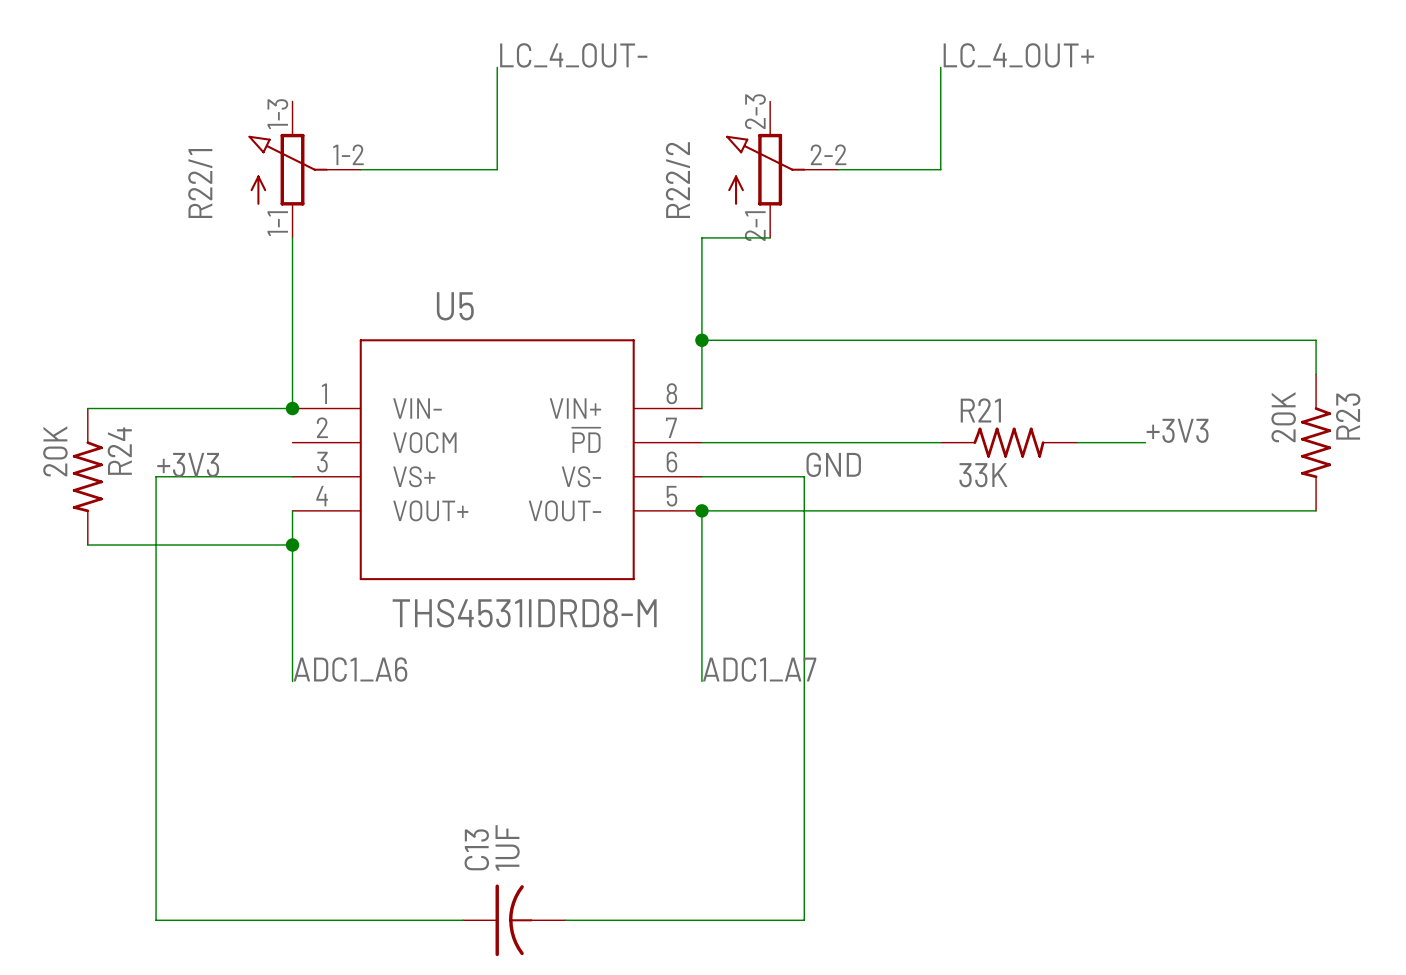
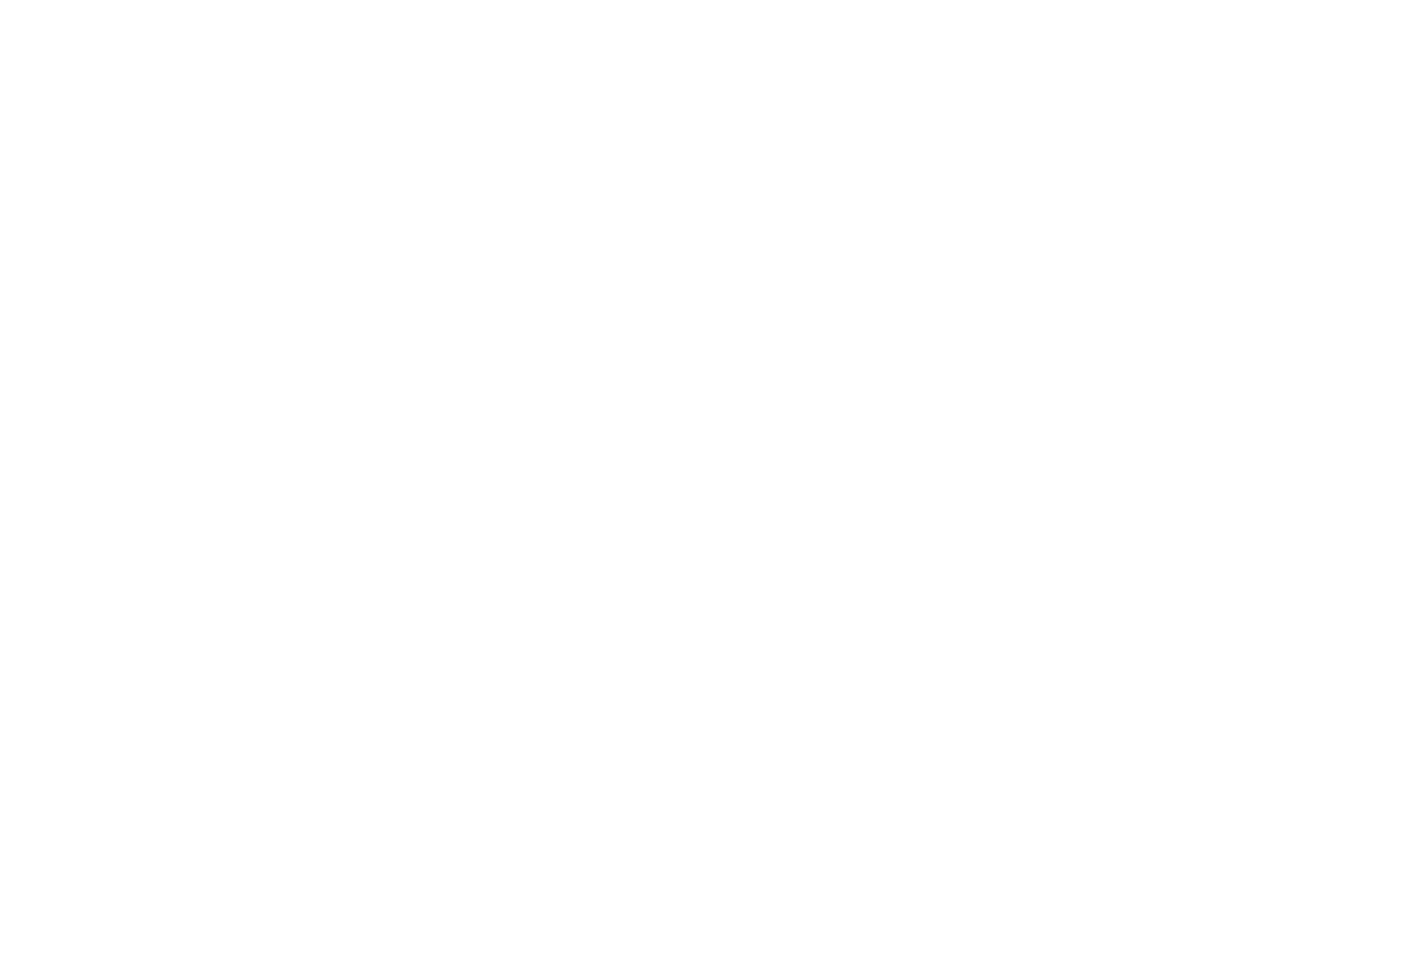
label: LC_4_OUT- (573, 55) -> none
label: LC_4_OUT+ (1018, 55) -> none
wire: (497, 67) (497, 169) (360, 169) -> none
wire: (940, 67) (940, 169) (838, 169) -> none
R22/1: (304, 169) -> none
R22/2: (782, 169) -> none
wire: (292, 237) (292, 408) (87, 408) -> none
wire: (770, 237) (701, 237) (701, 408) -> none
wire: (701, 340) (1316, 340) (1316, 374) -> none
junction: (701, 340) -> none
junction: (292, 408) -> none
label: +3V3 (1177, 430) -> none
wire: (701, 442) (940, 442) -> none
R21: 33K (1009, 442) -> none
wire: (1077, 442) (1145, 442) -> none
R23: 20K (1316, 442) -> none
U5: THS4531IDRD8-M (497, 459) -> none
label: +3V3 (188, 464) -> none
label: GND (833, 464) -> none
R24: 20K (87, 476) -> none
wire: (292, 476) (156, 476) (156, 920) (463, 920) -> none
wire: (701, 476) (804, 476) (804, 920) (565, 920) -> none
wire: (292, 510) (292, 681) -> none
junction: (701, 510) -> none
wire: (1316, 510) (701, 510) (701, 681) -> none
wire: (87, 544) (292, 544) -> none
junction: (292, 544) -> none
label: ADC1_A6 (350, 669) -> none
label: ADC1_A7 (759, 669) -> none
C13: 1UF (514, 920) -> none

